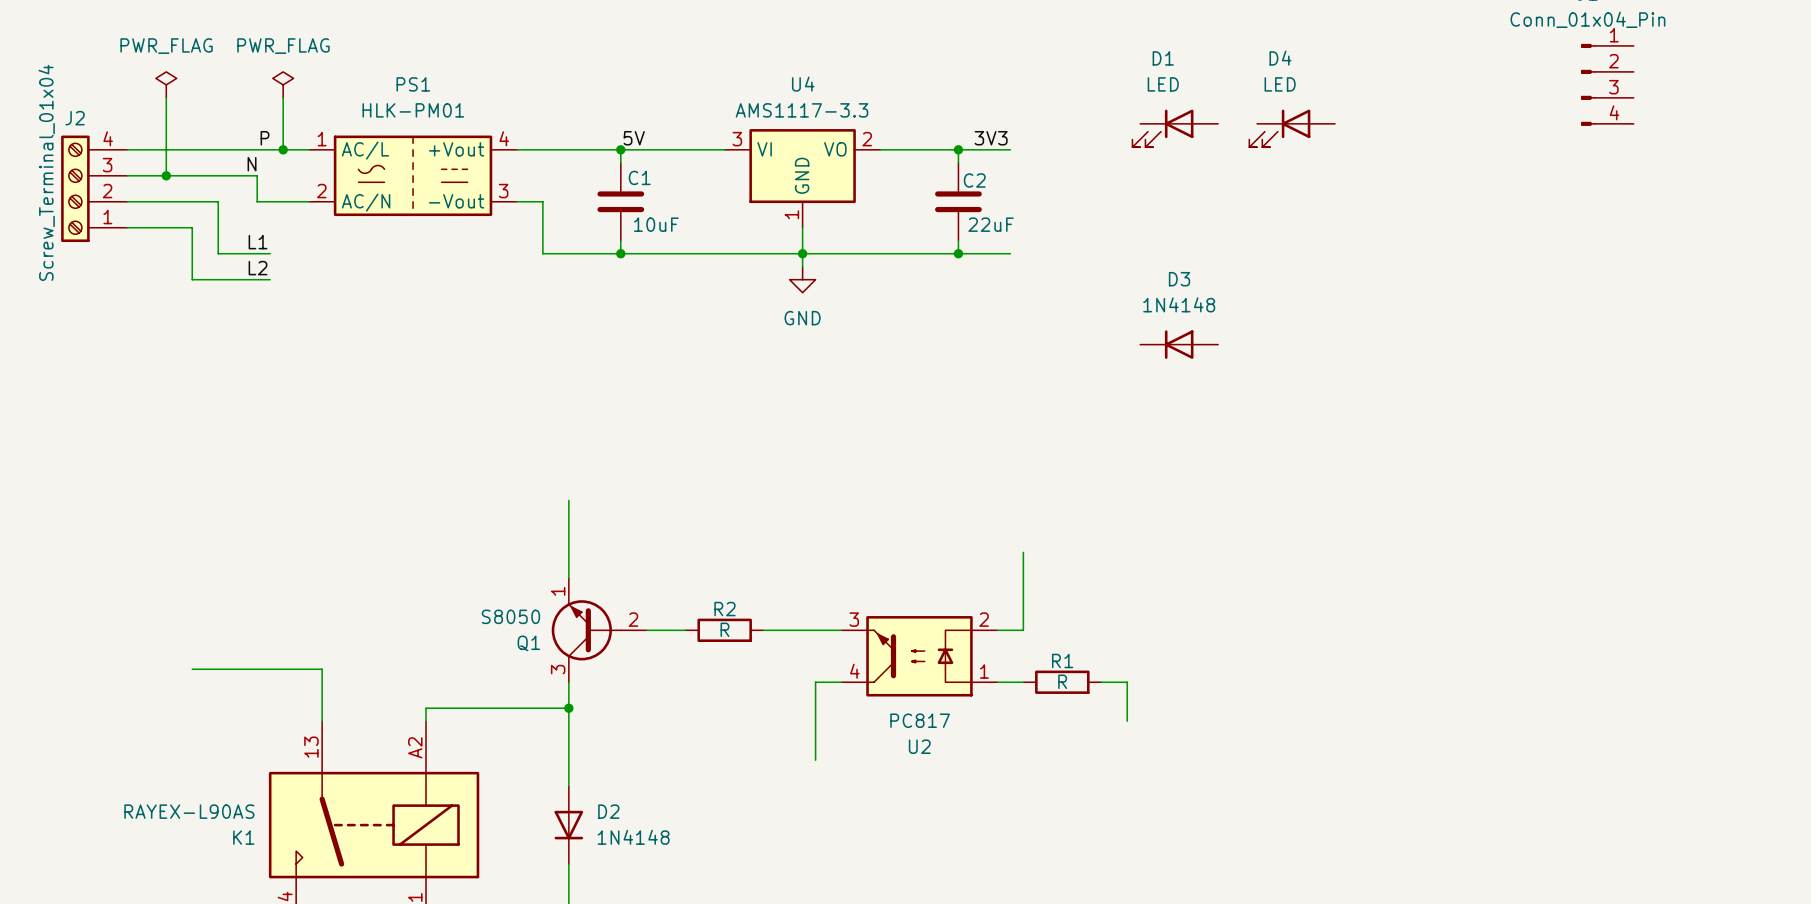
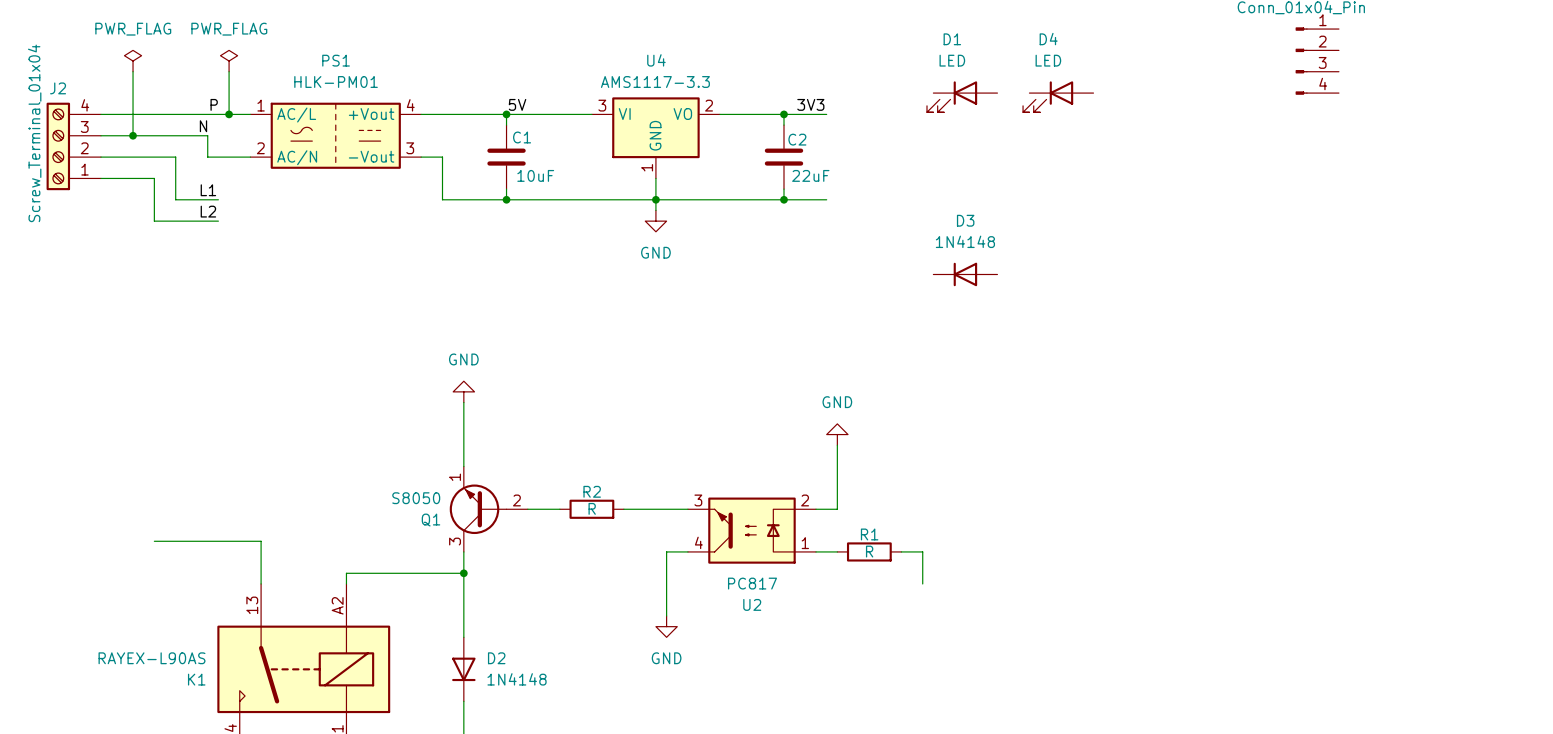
power symbol: none -> GND (463, 391)
power symbol: none -> GND (837, 434)
power symbol: none -> GND (666, 626)

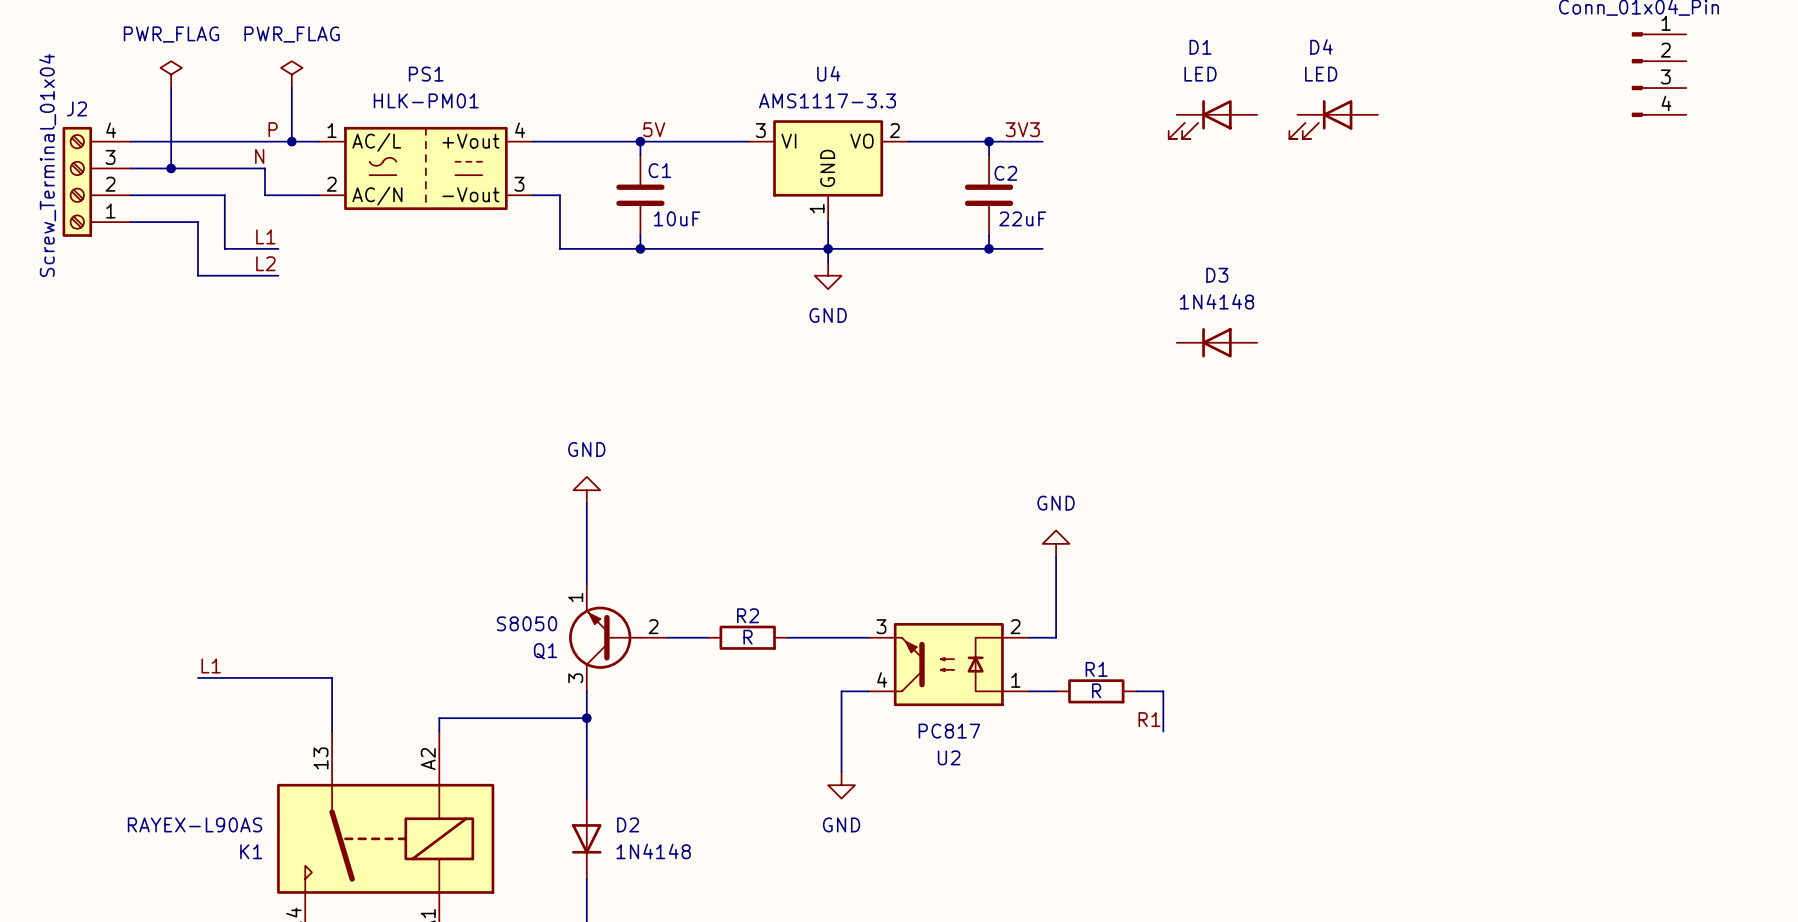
label: none -> L1 (211, 665)
label: none -> R1 (1149, 719)

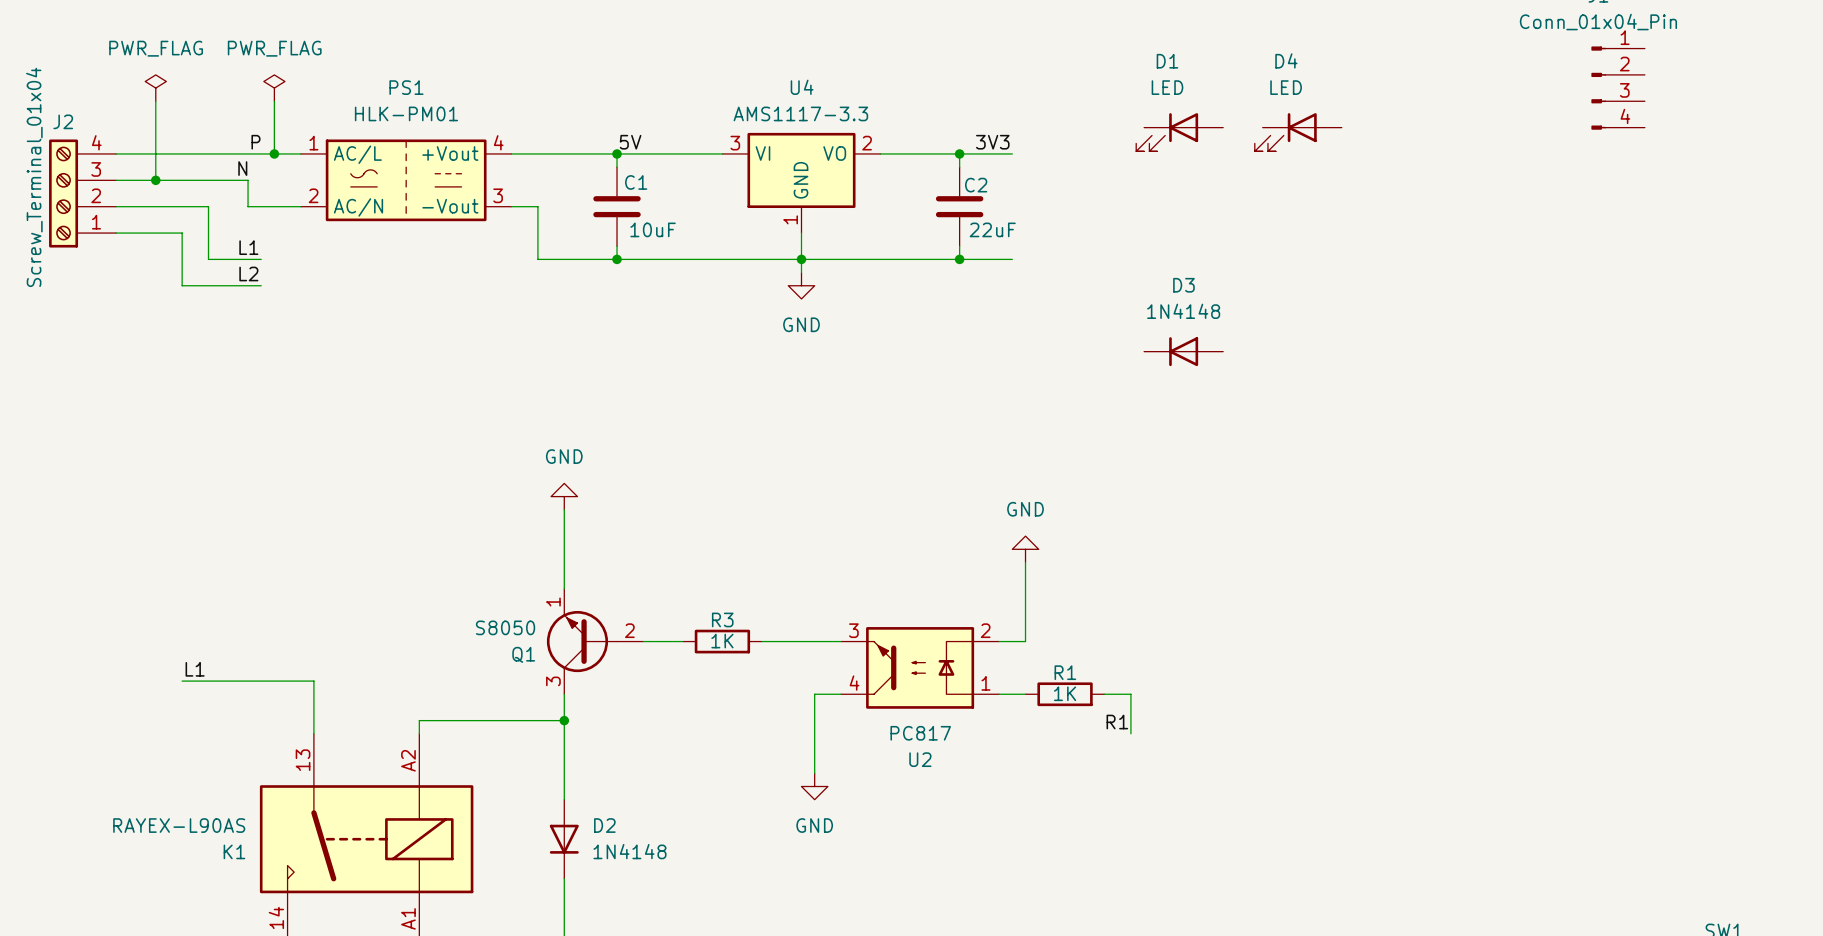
R2 name: R2 (748, 615) -> R3 (722, 619)
R2 value: R (748, 637) -> 1K (722, 641)
R1 value: R (1096, 690) -> 1K (1065, 693)

